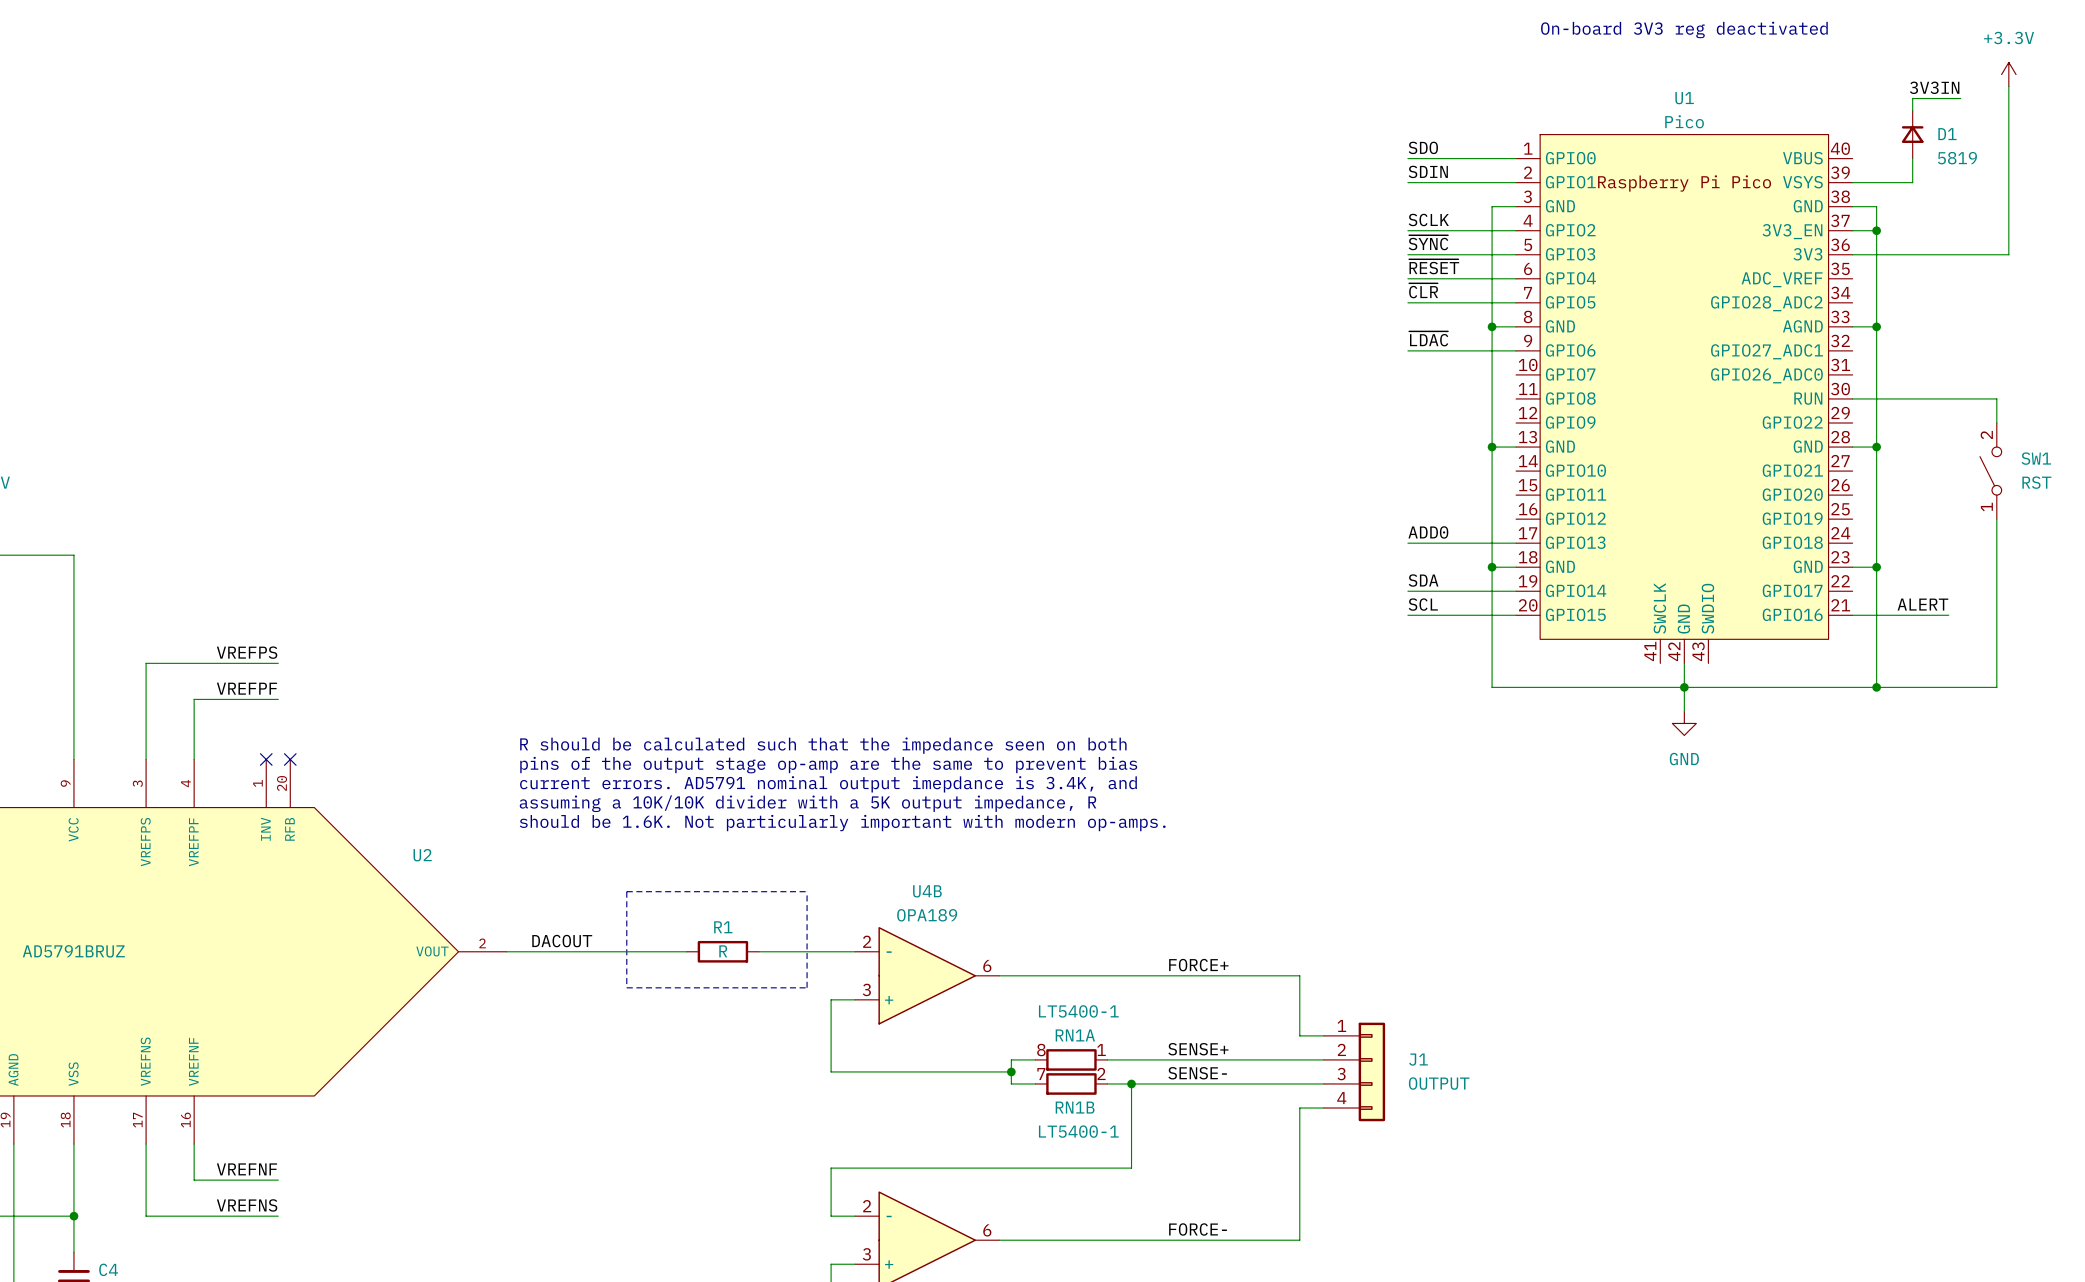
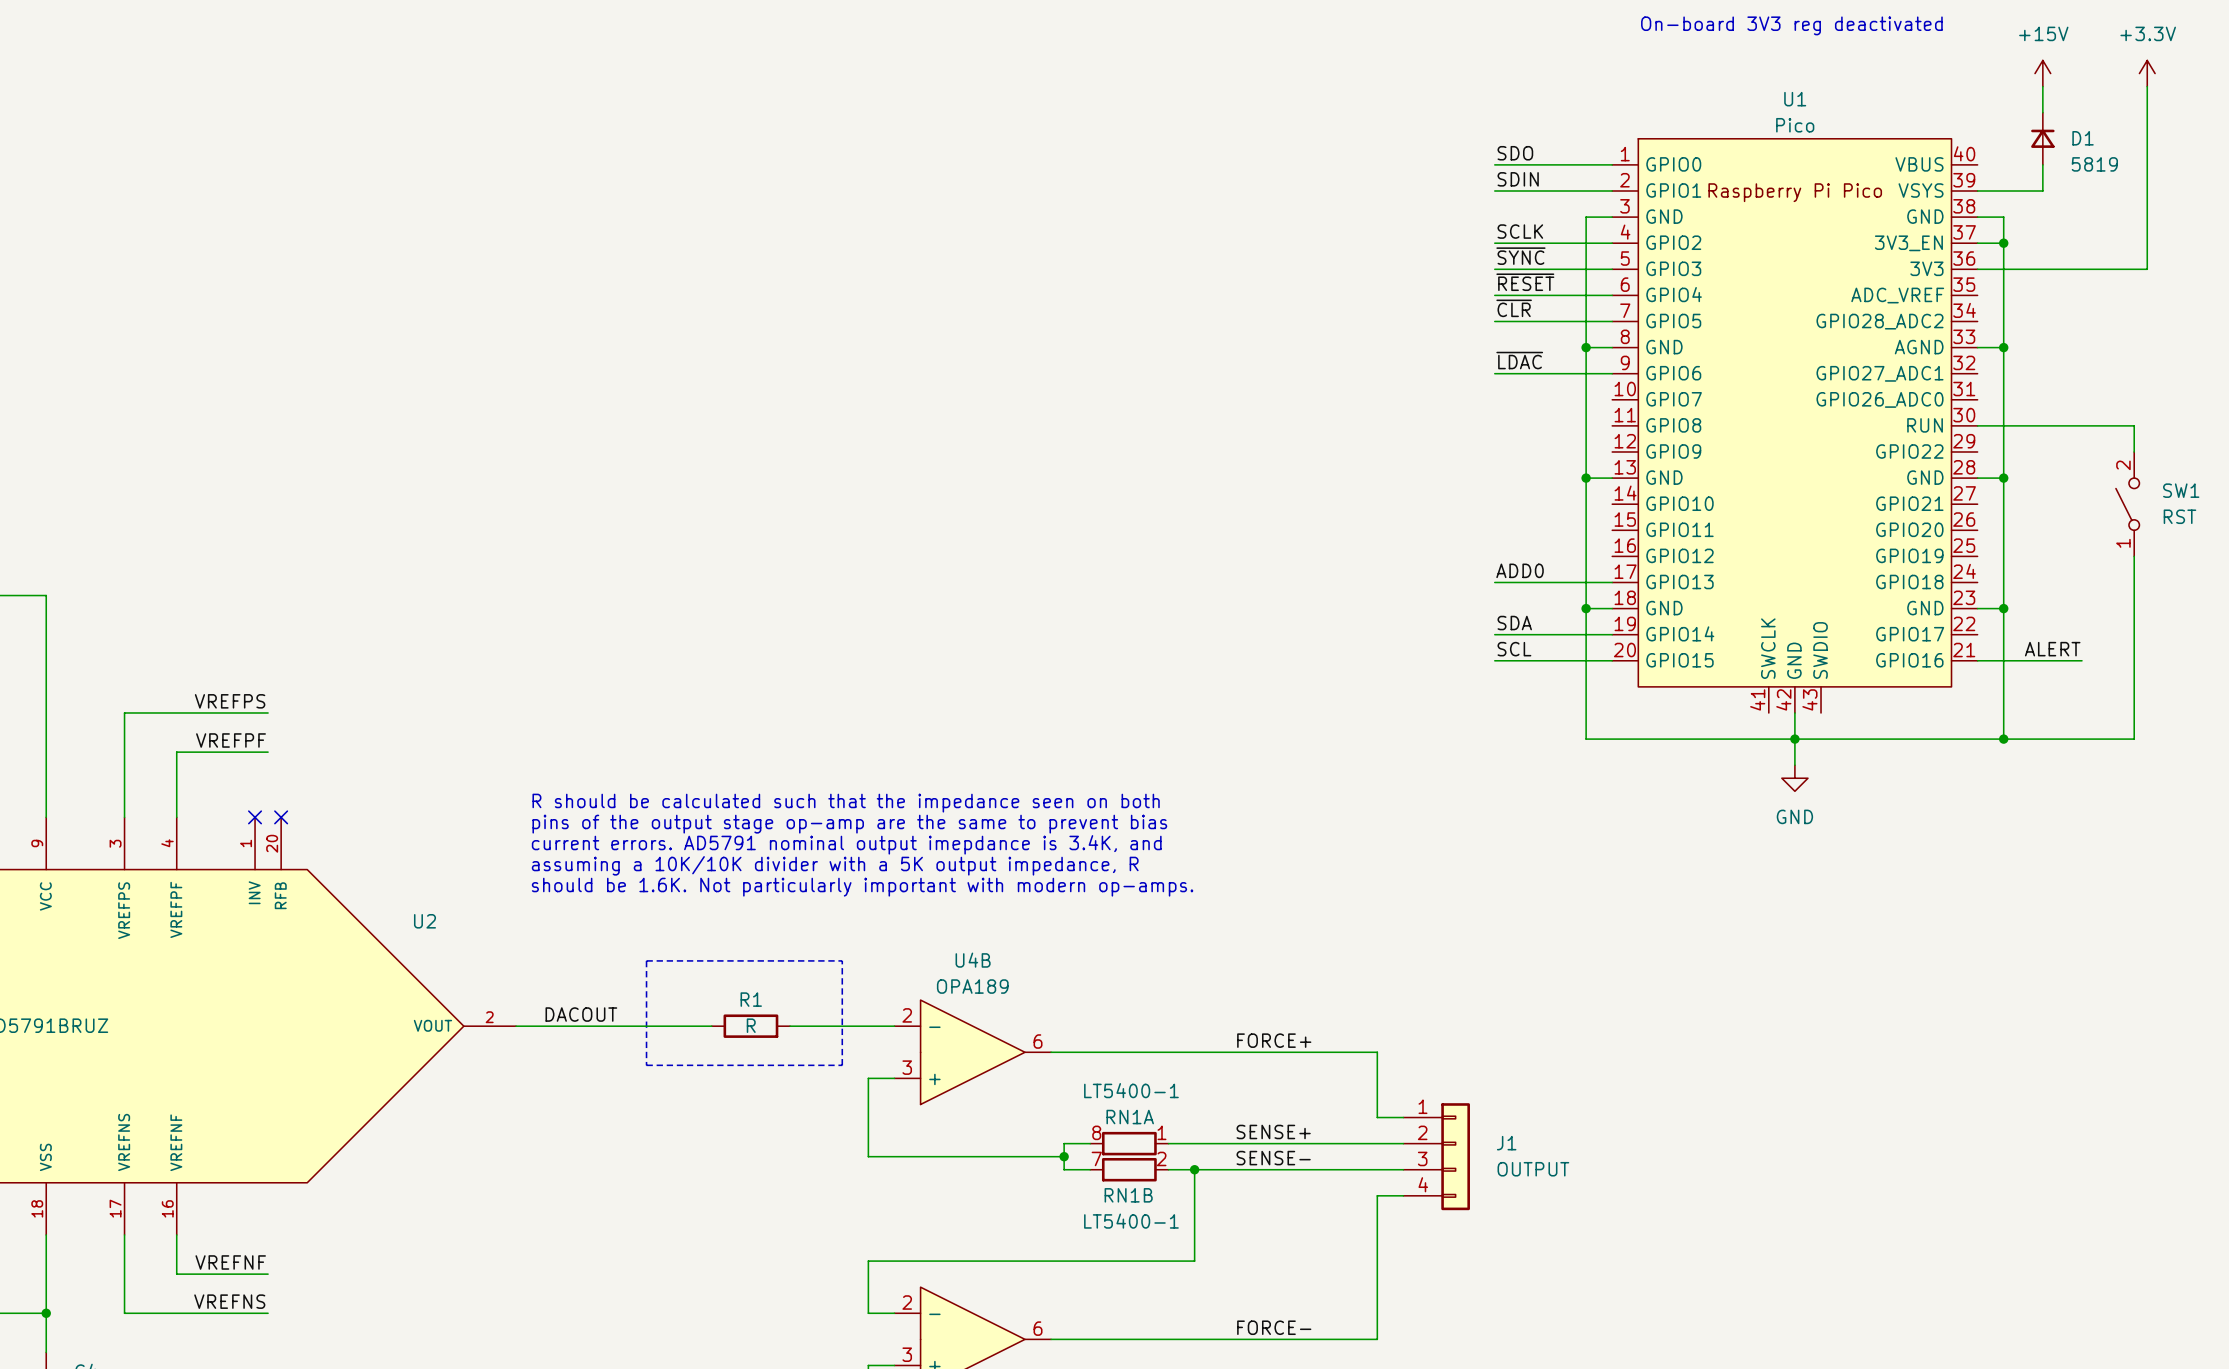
power symbol: none -> +15V (2042, 73)
label: 3V3IN (1934, 87) -> none
wire: (1912, 98) (1960, 98) -> (2042, 99) (2042, 86)

